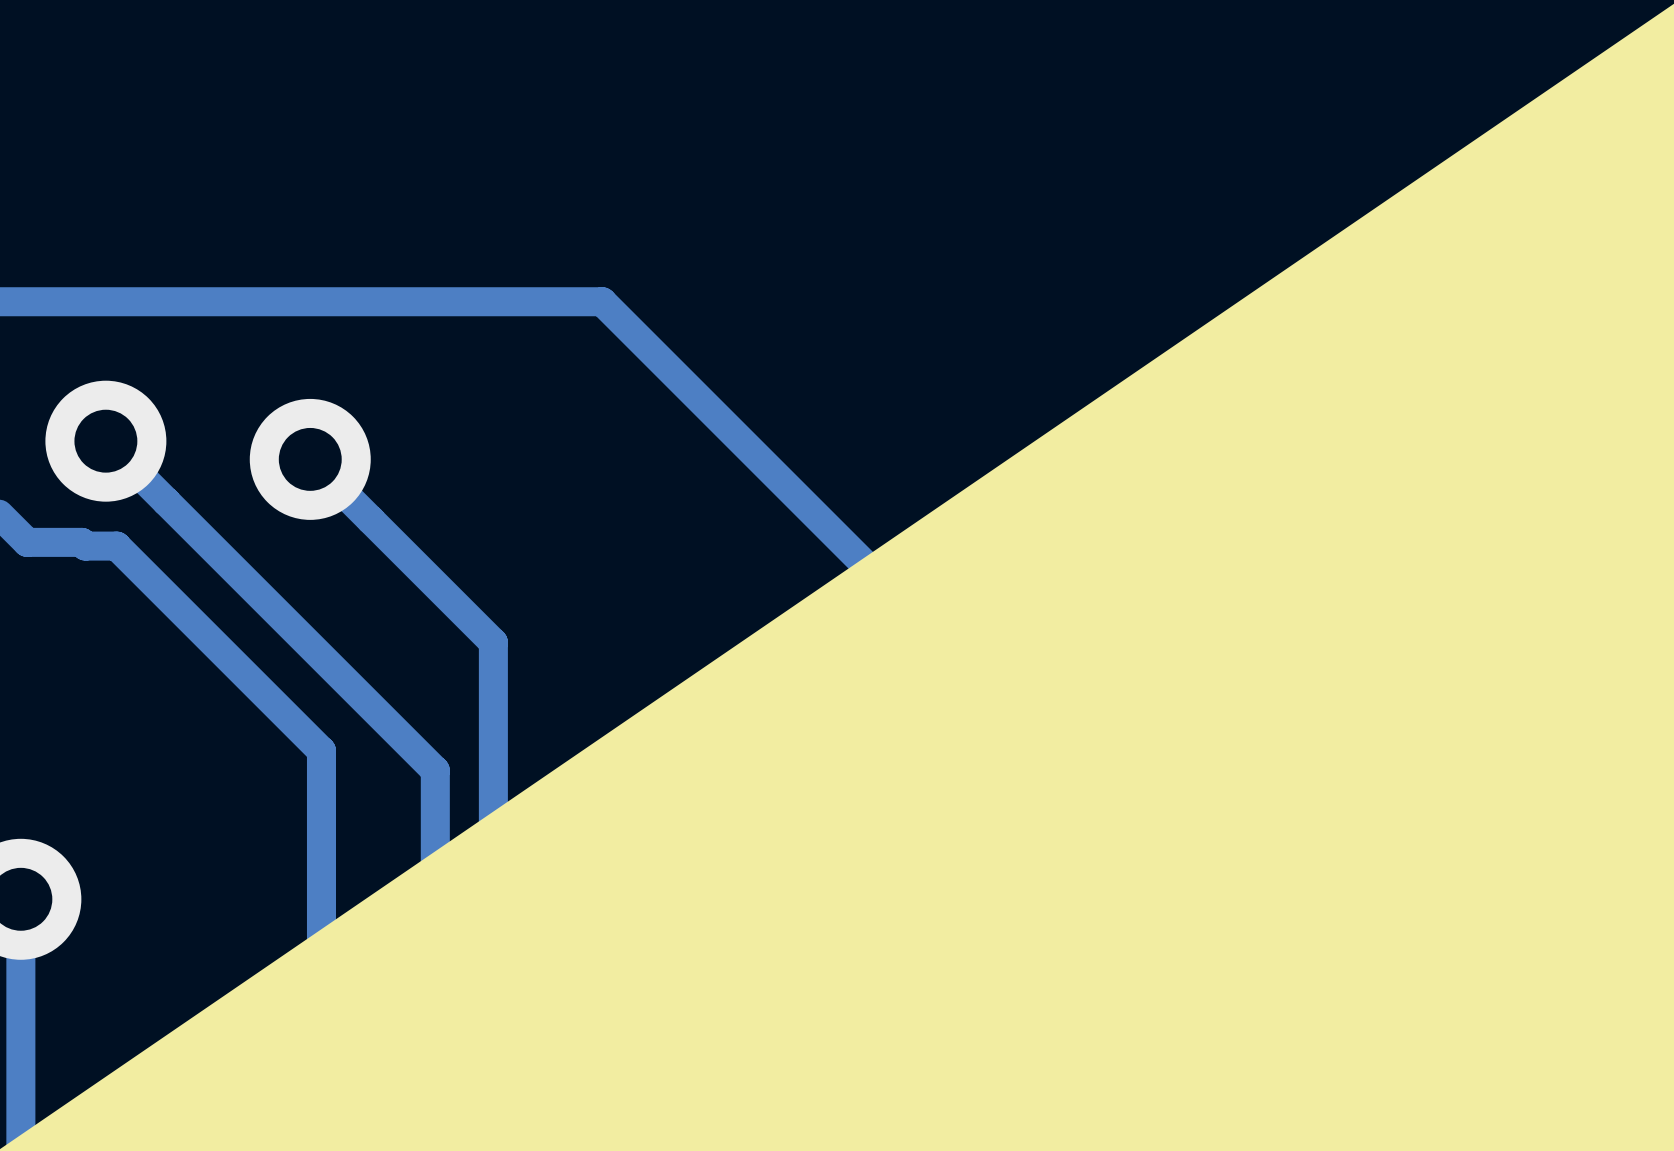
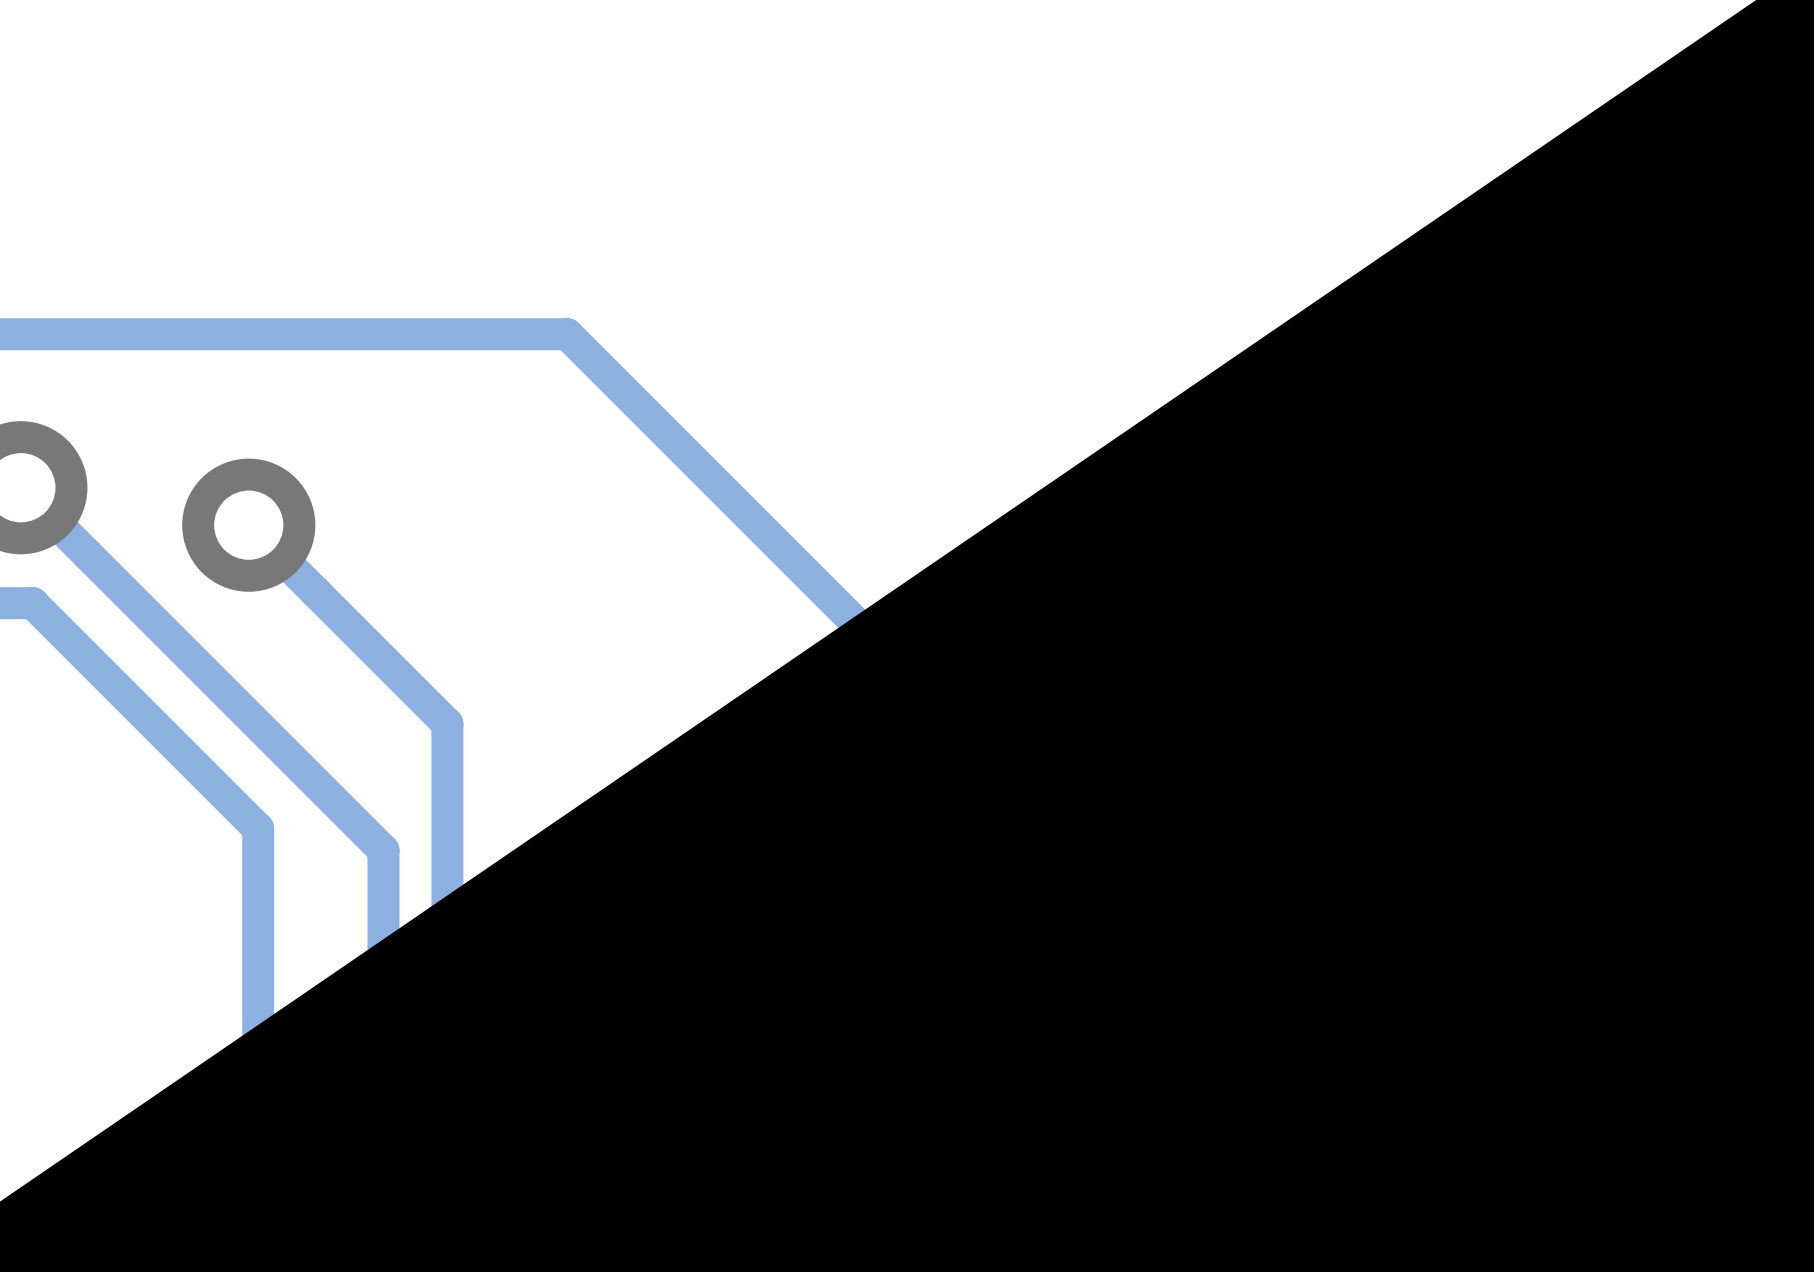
track: (310, 459) (493, 642) (493, 655) -> (248, 525) (447, 723)
via position: (310, 459) -> (248, 525)

